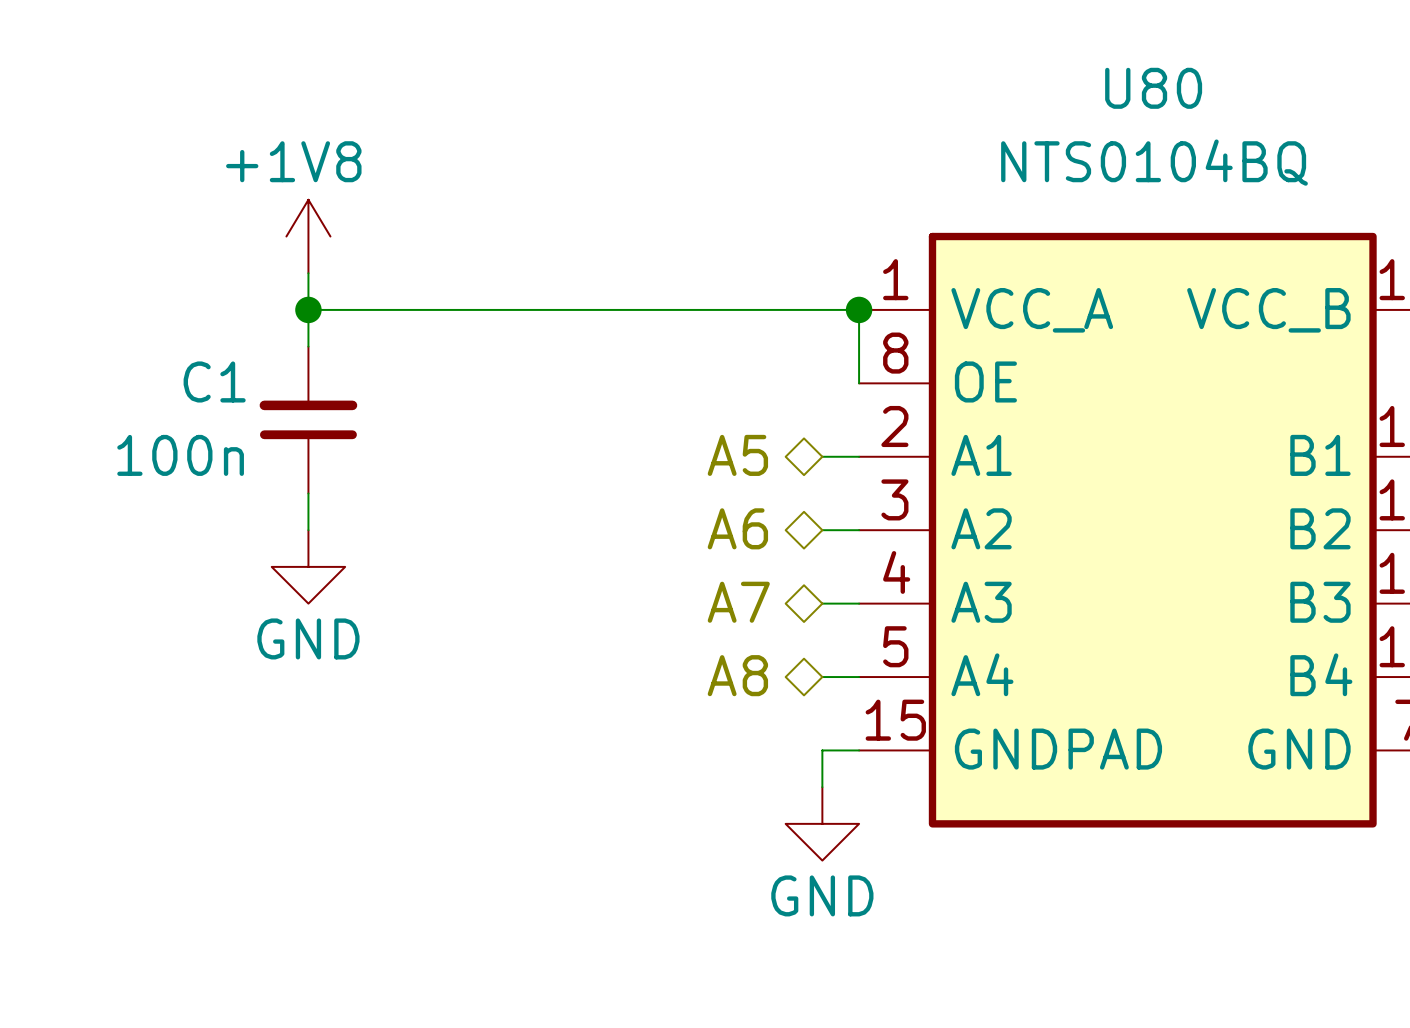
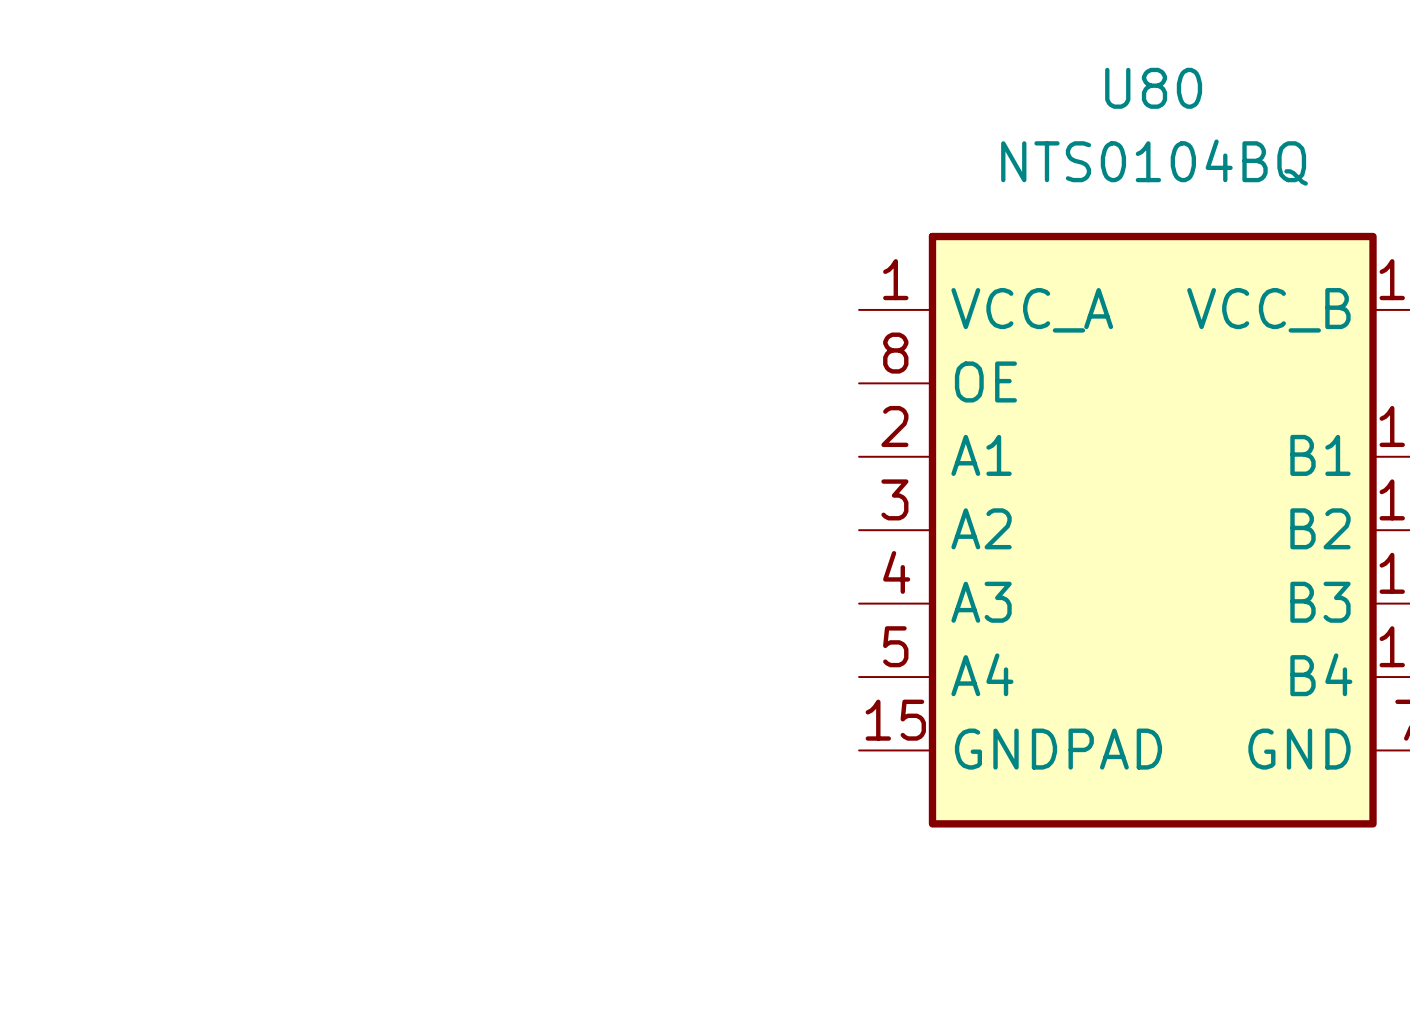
power symbol: +1V8 (308, 236) -> none
wire: (308, 273) (308, 346) -> none
wire: (308, 309) (859, 309) (859, 383) -> none
junction: (308, 309) -> none
junction: (859, 309) -> none
C1: (308, 420) -> none
hierarchical label: A5 (737, 455) -> none
wire: (822, 456) (859, 456) -> none
wire: (308, 493) (308, 530) -> none
hierarchical label: A6 (737, 528) -> none
wire: (822, 530) (859, 530) -> none
power symbol: GND (308, 566) -> none
hierarchical label: A7 (738, 602) -> none
wire: (822, 603) (859, 603) -> none
hierarchical label: A8 (737, 675) -> none
wire: (822, 677) (859, 677) -> none
wire: (859, 750) (822, 750) (822, 787) -> none
power symbol: GND (822, 823) -> none

